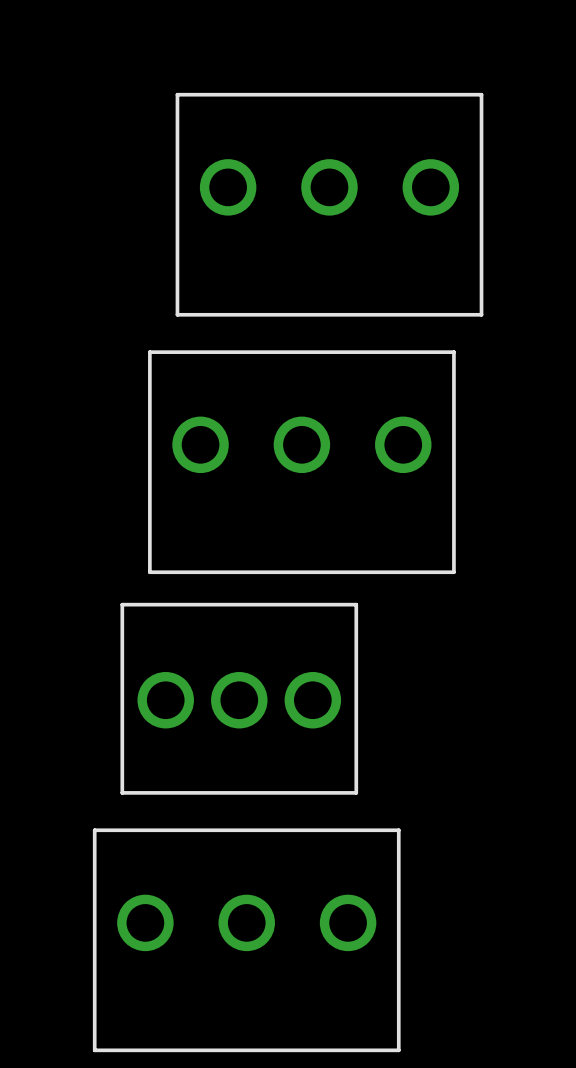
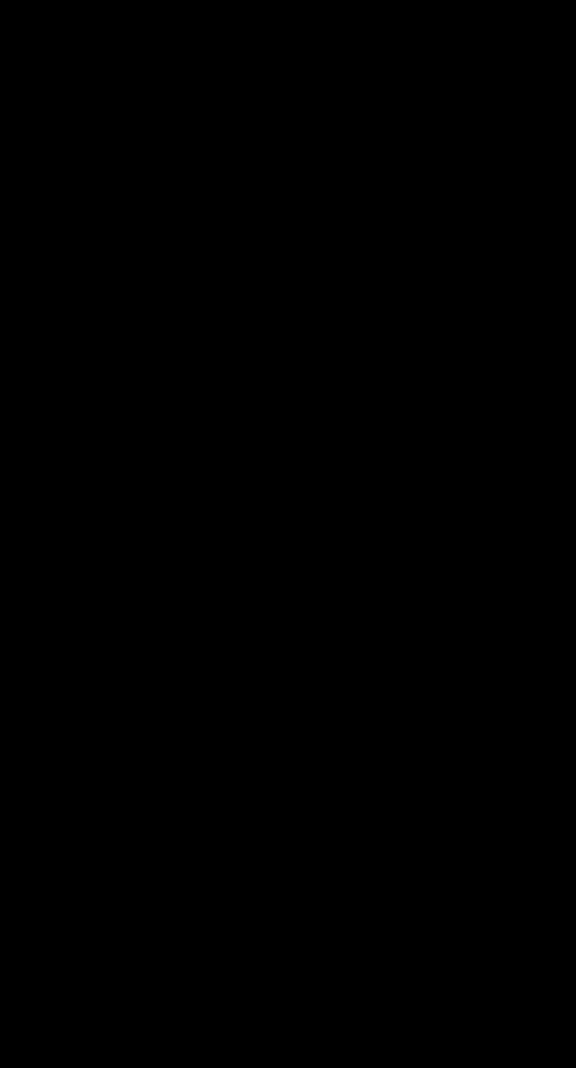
part: (329, 204) -> none
part: (301, 462) -> none
part: (239, 698) -> none
part: (246, 940) -> none

